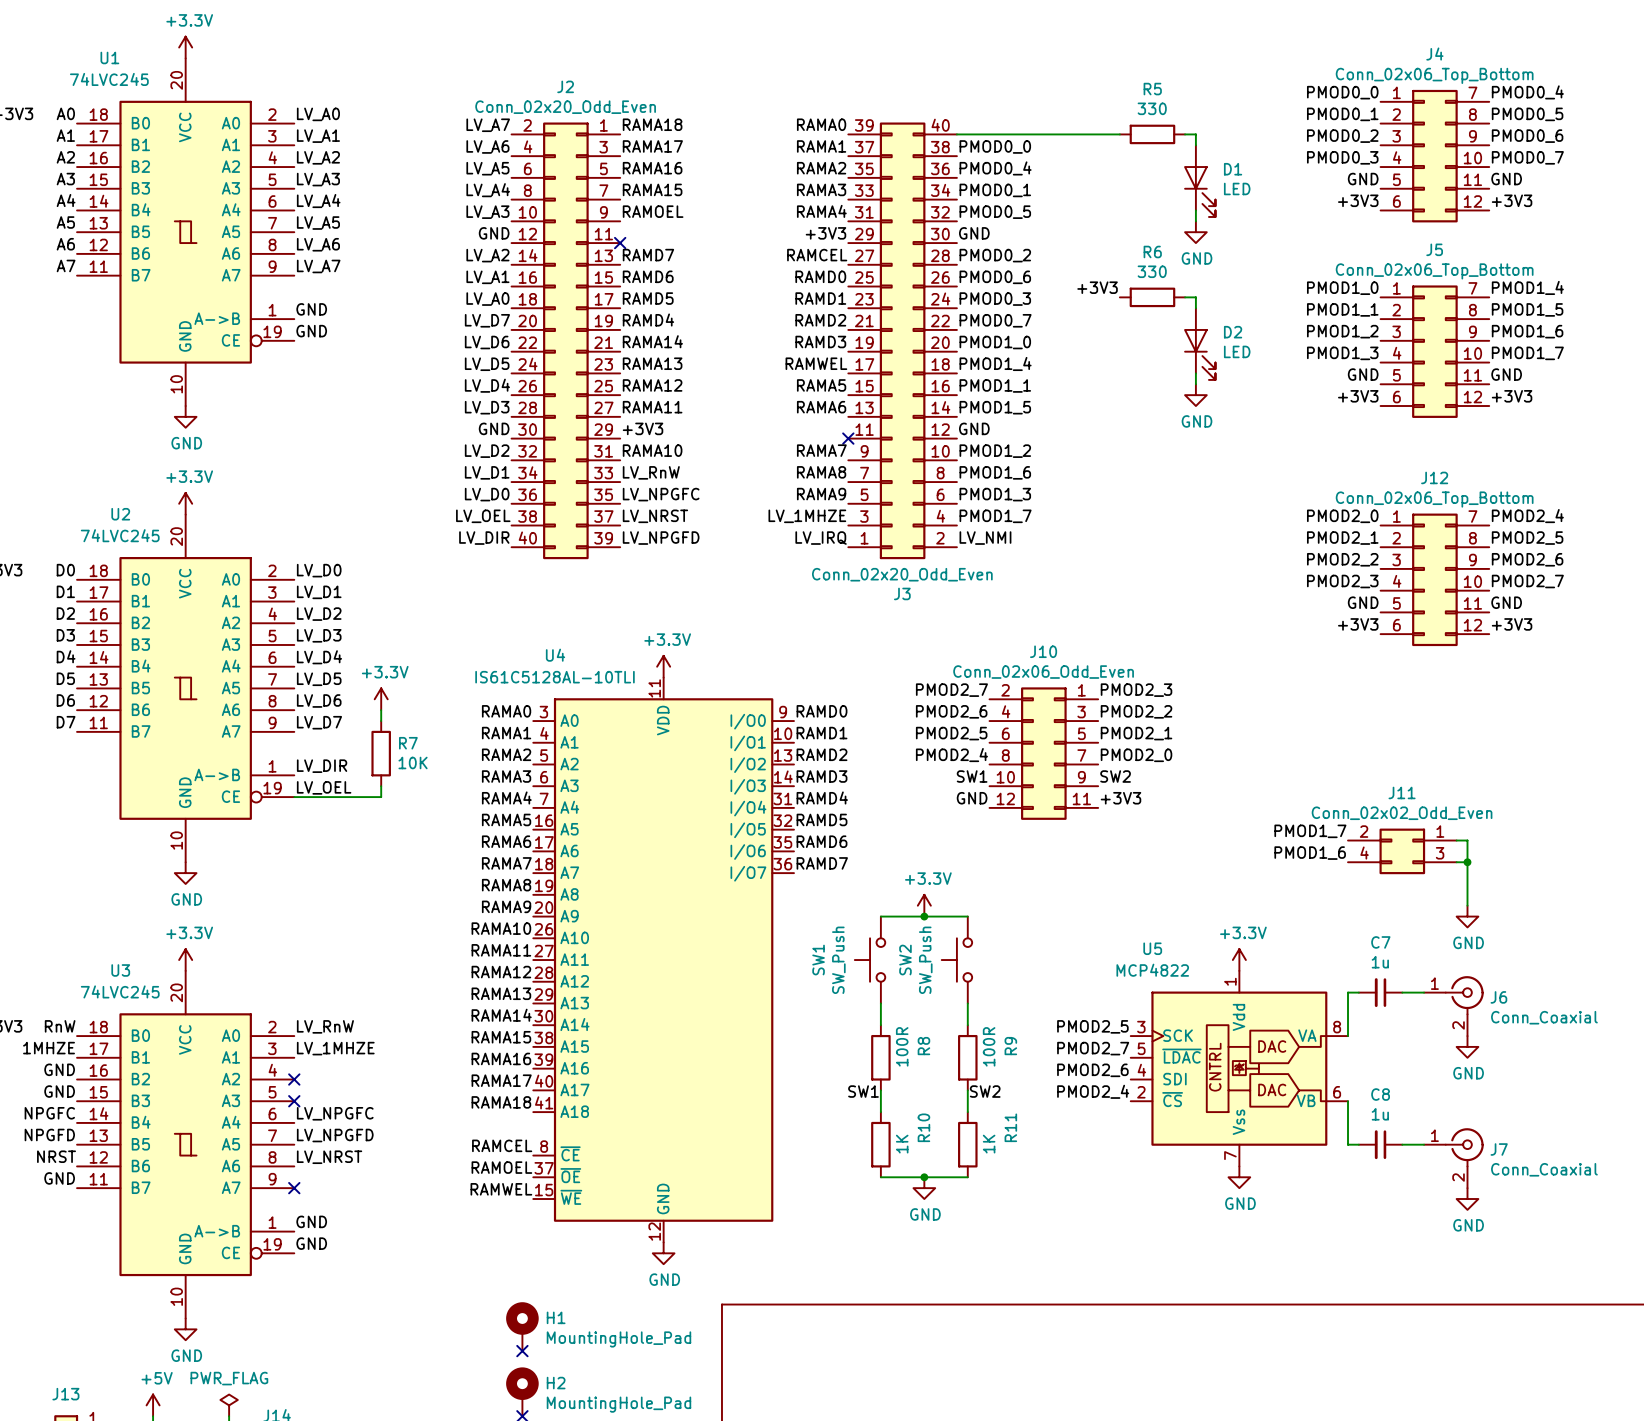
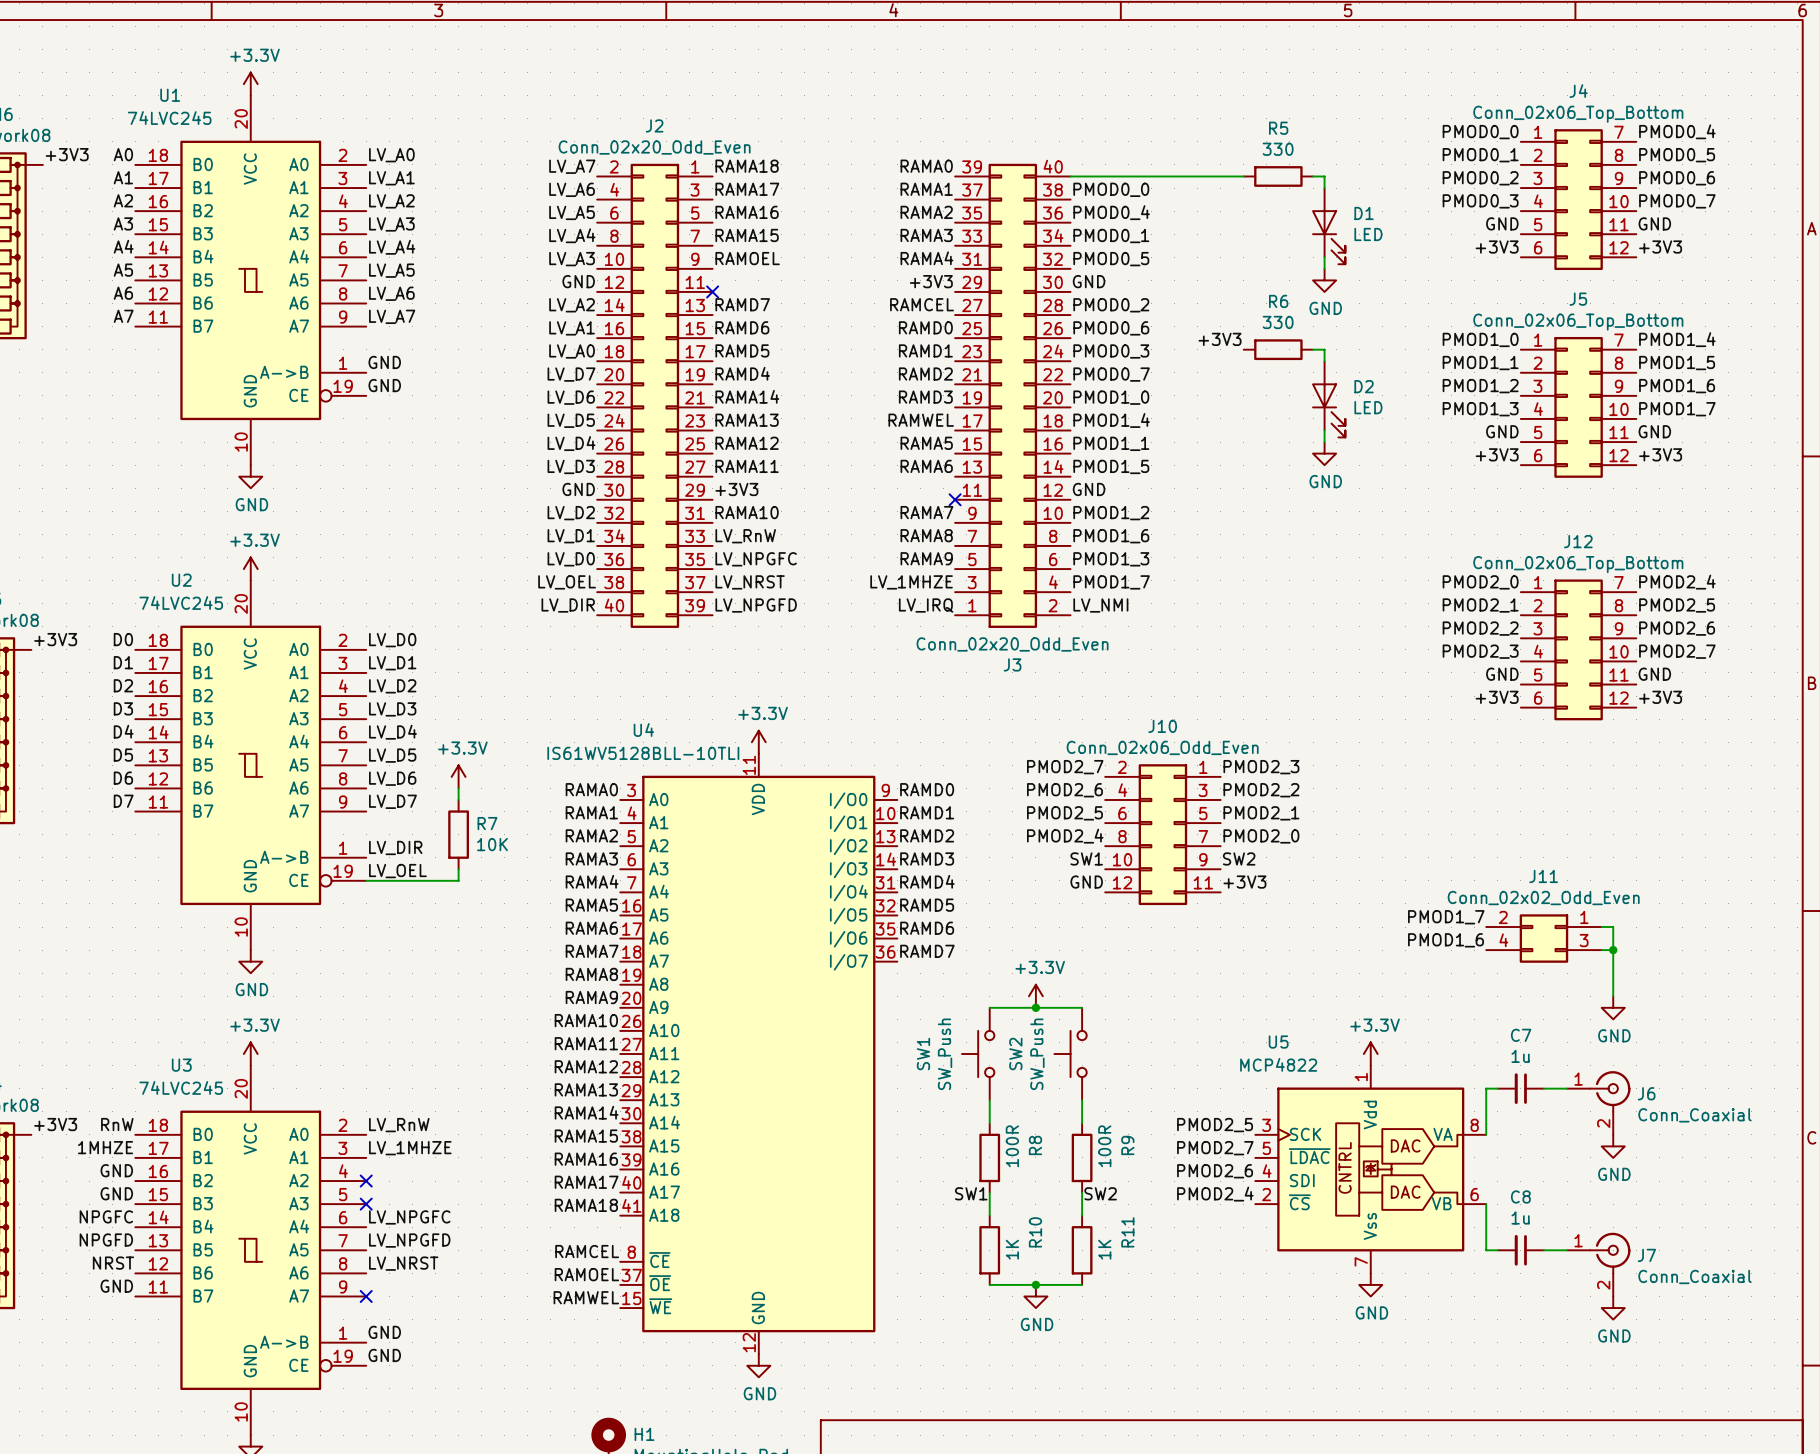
U4 value: IS61C5128AL-10TLI (555, 677) -> IS61WV5128BLL-10TLI (643, 753)

